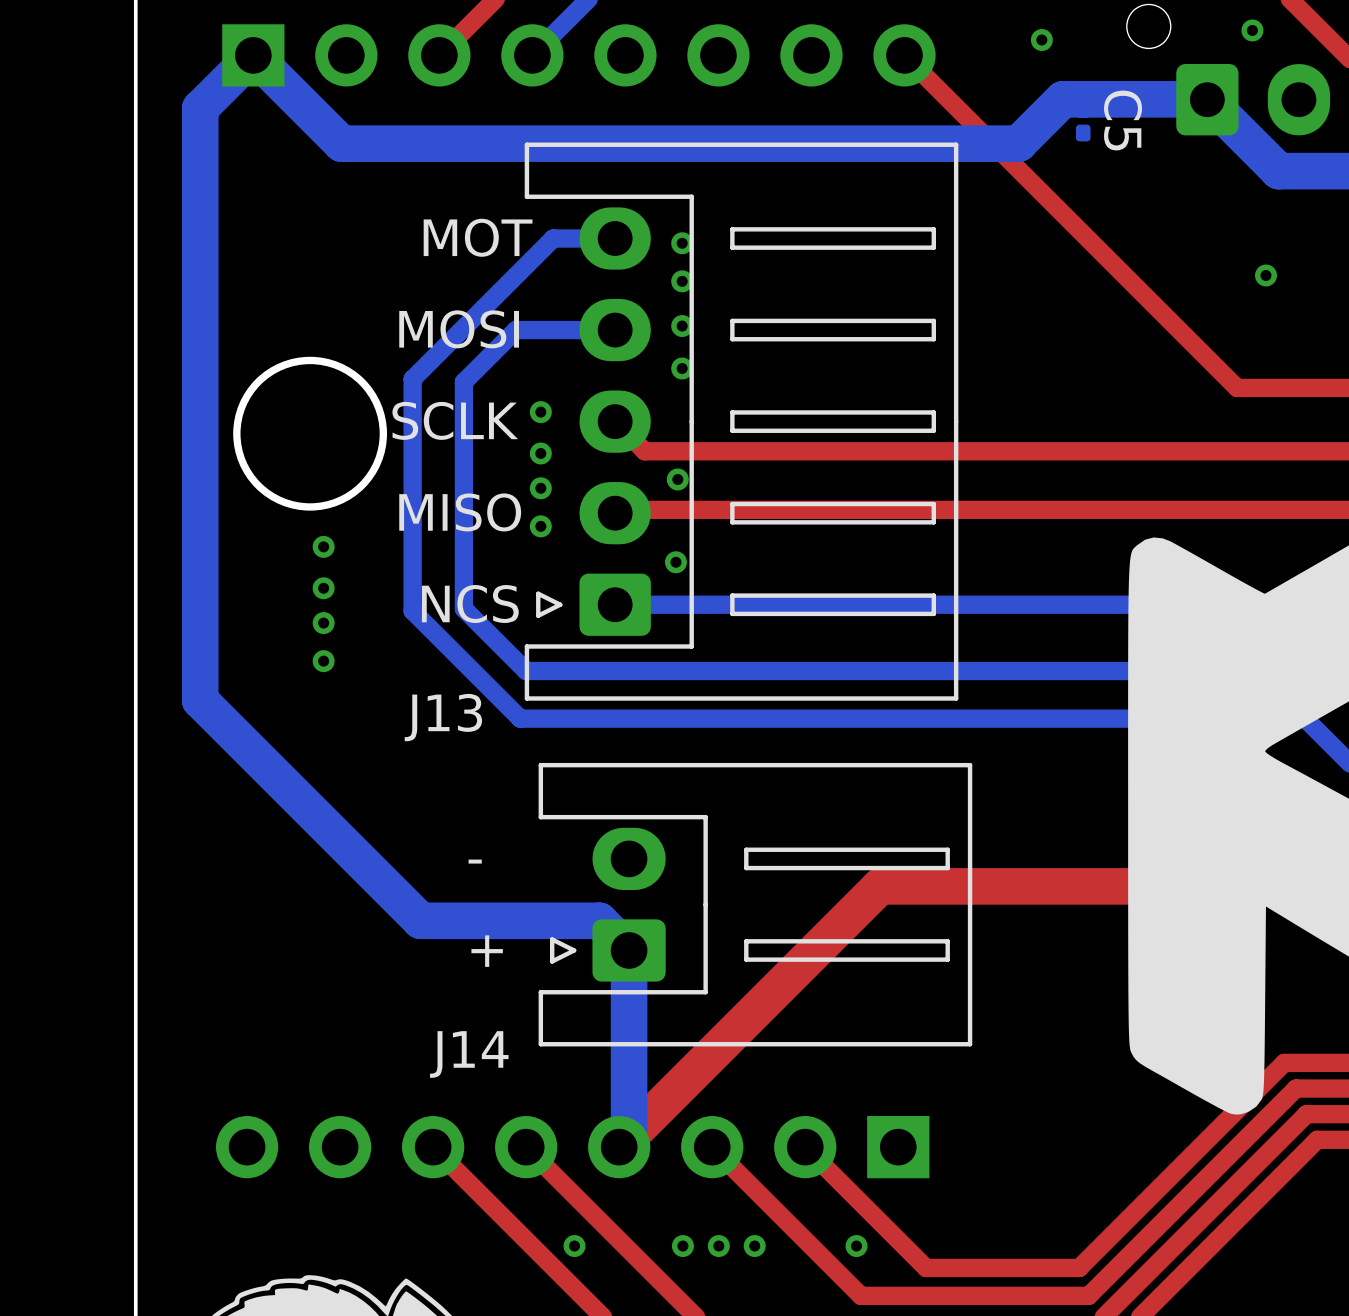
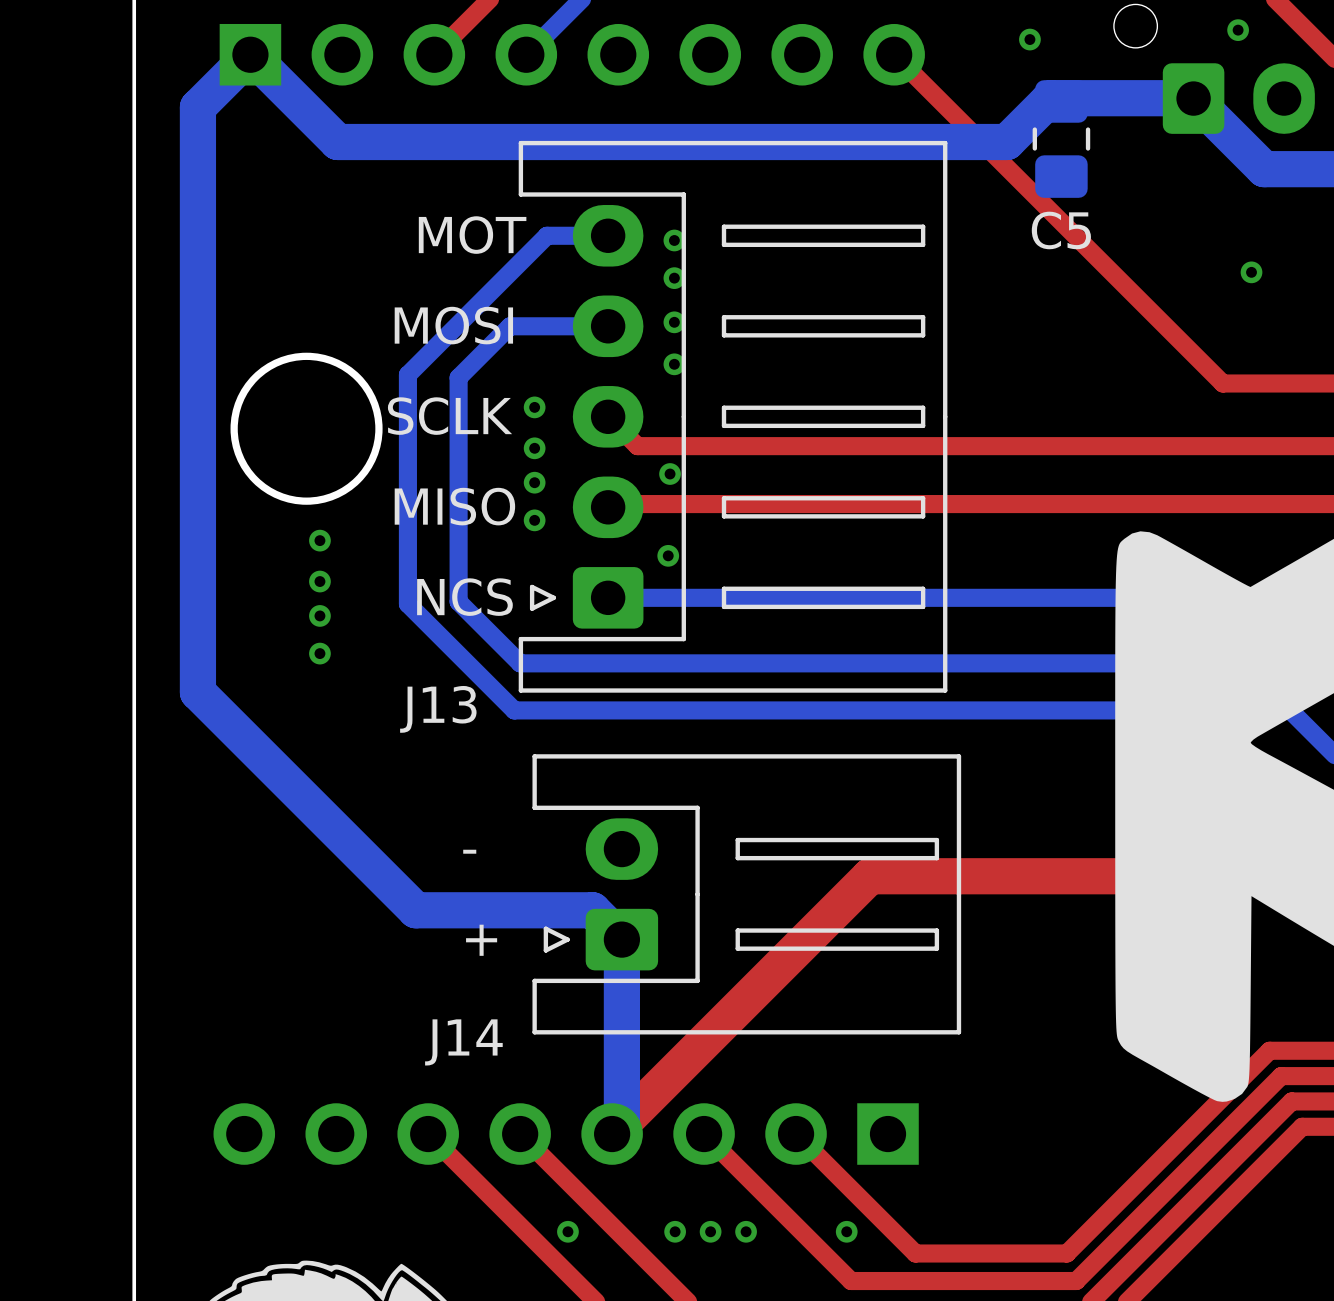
C5 footprint: [1075, 101, 1091, 142] -> [1032, 80, 1091, 198]
C5 name position: C5 (1123, 120) -> C5 (1061, 230)

